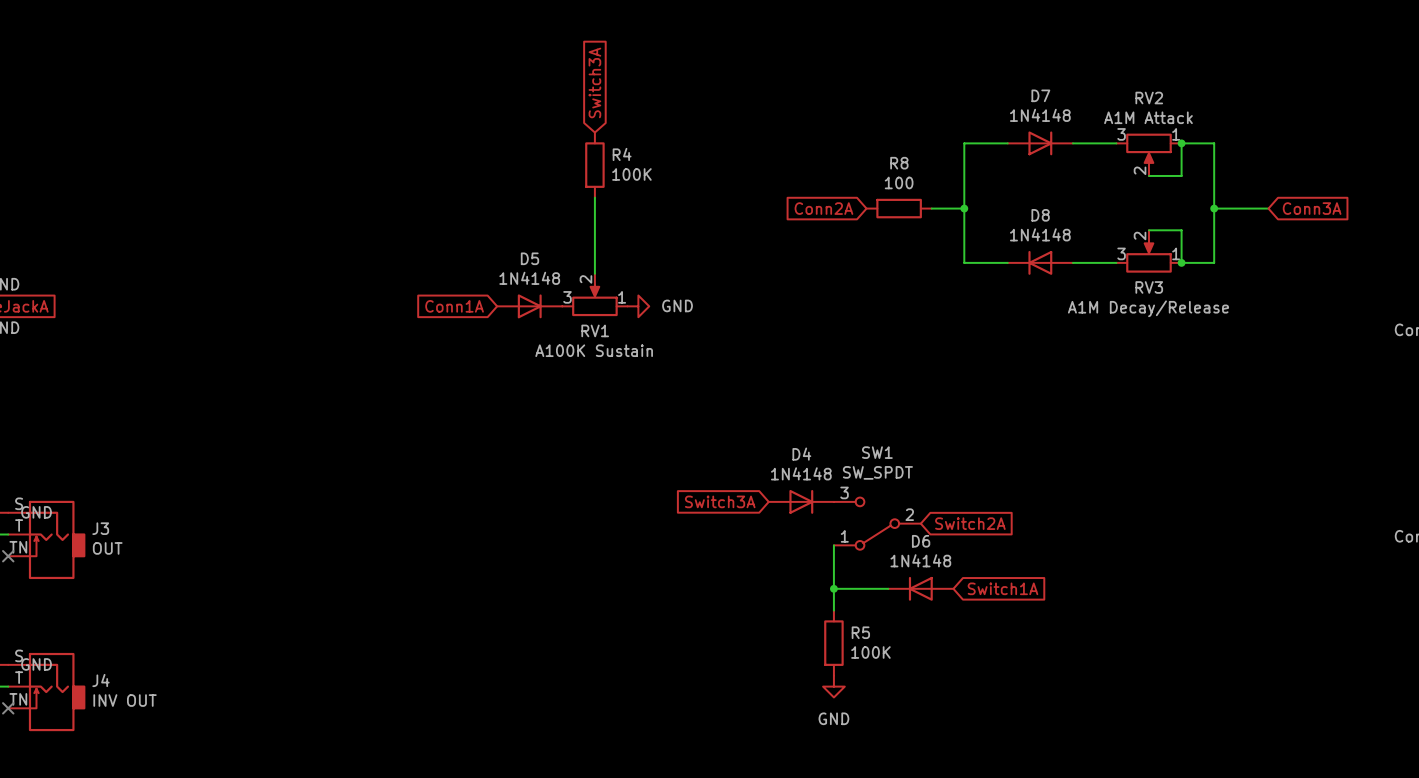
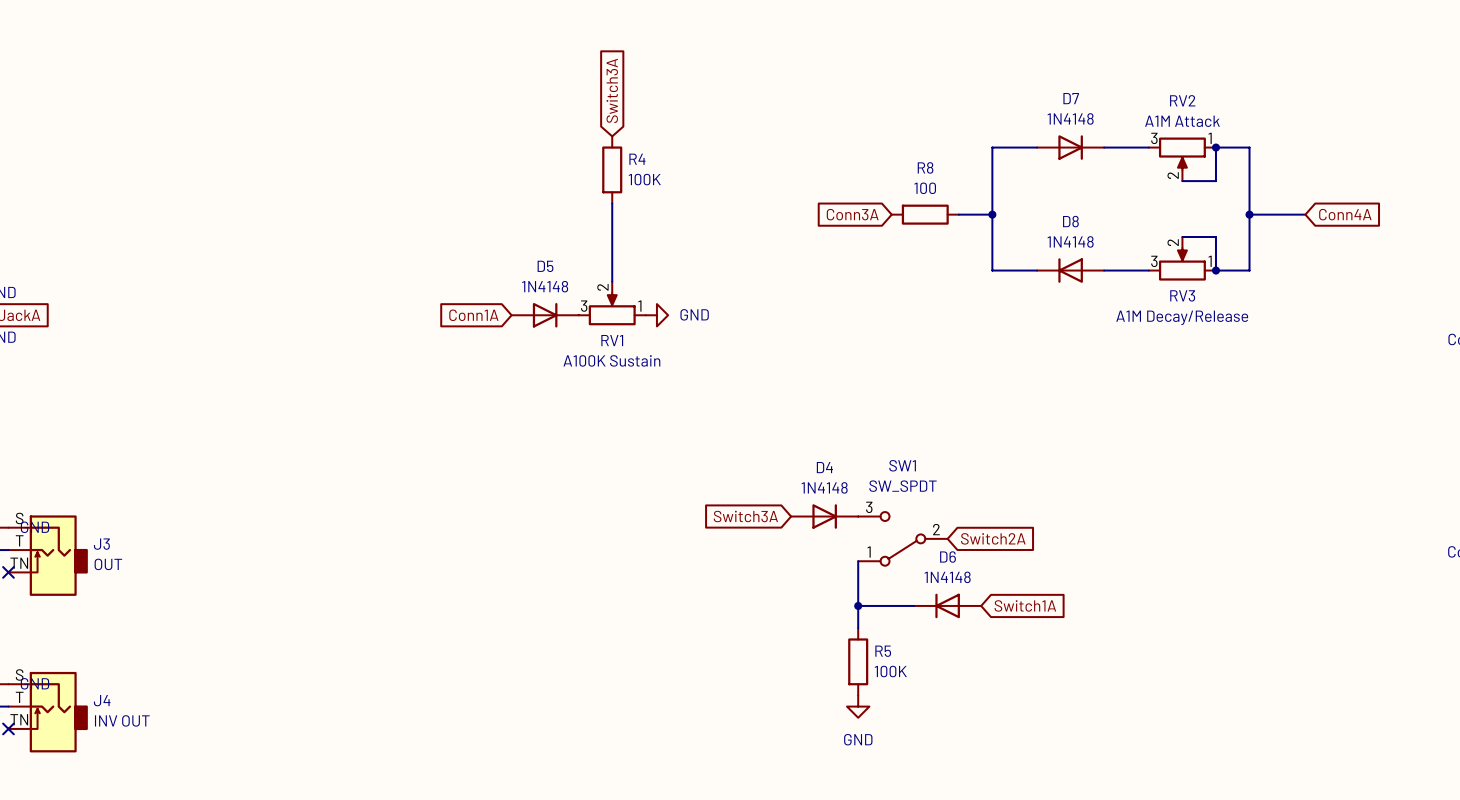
global label: Conn2A (823, 208) -> Conn3A (852, 214)
global label: Conn3A (1312, 208) -> Conn4A (1345, 214)

